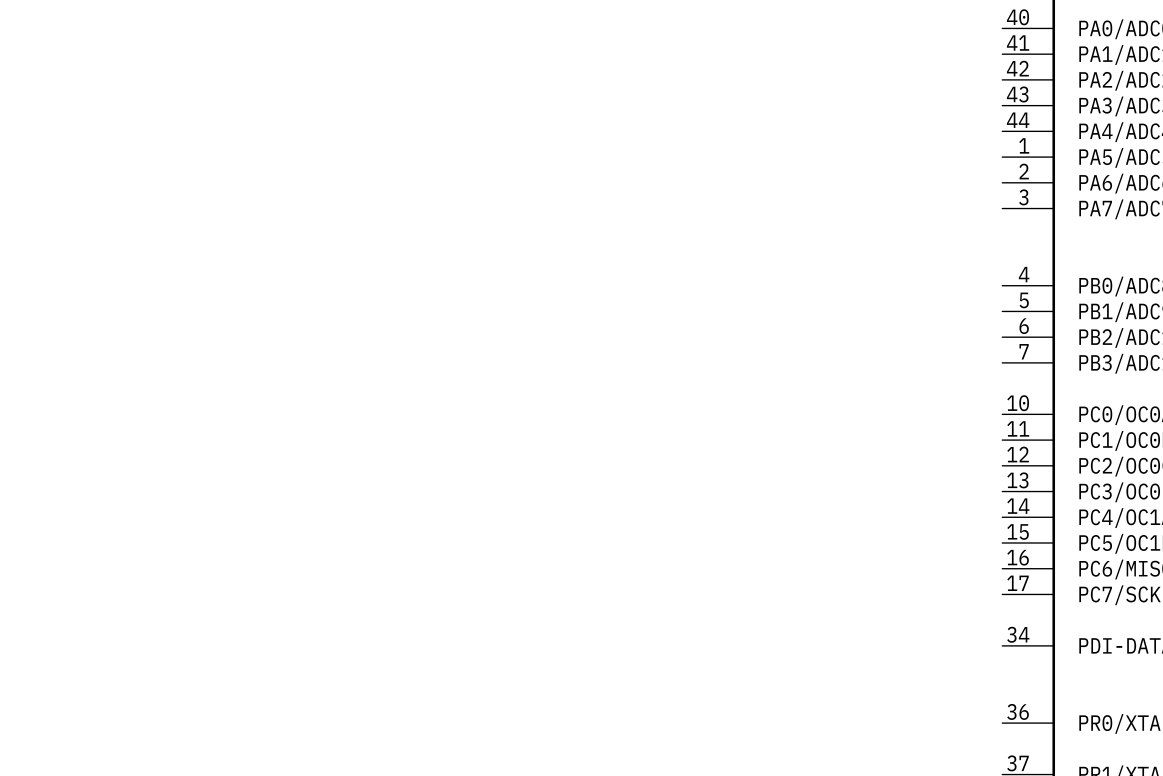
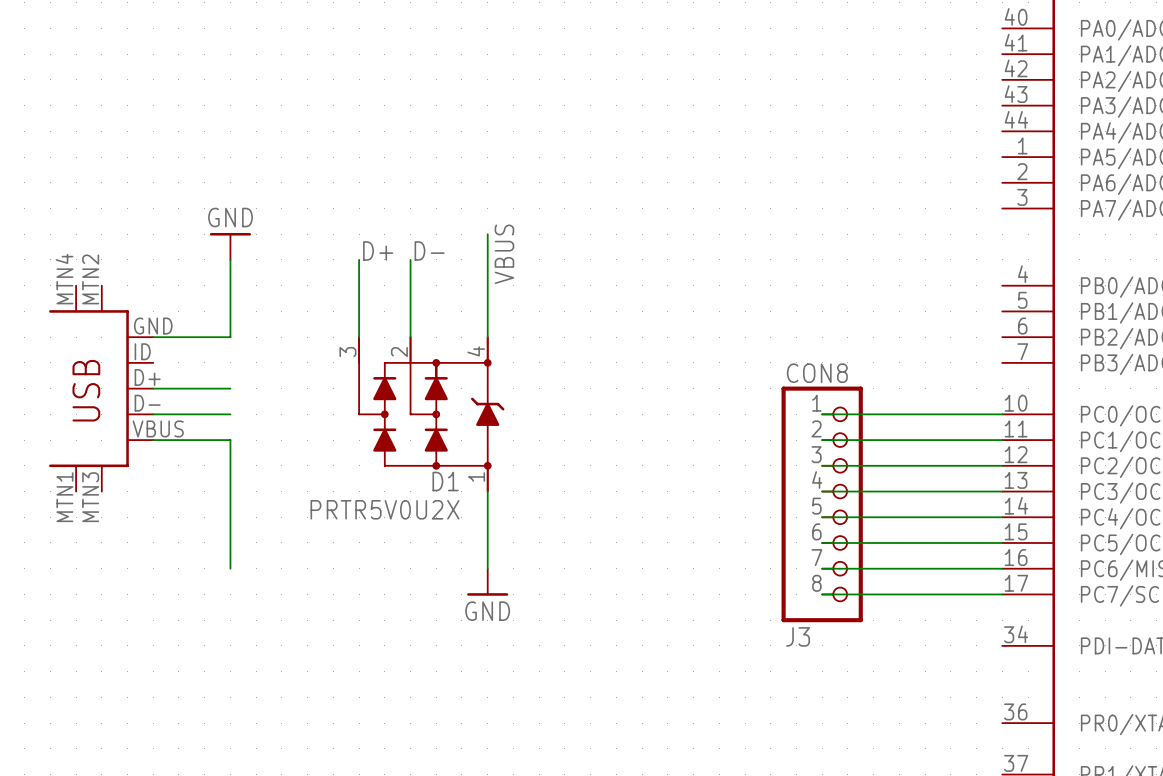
wire: none -> (487, 234) (487, 337)
power symbol: none -> GND (230, 246)
label: none -> D+ (378, 250)
label: none -> D- (429, 250)
label: none -> VBUS (504, 254)
wire: none -> (230, 259) (230, 337) (153, 337)
wire: none -> (359, 259) (359, 337)
wire: none -> (410, 259) (410, 337)
part: none -> (101, 388)
wire: none -> (153, 388) (230, 388)
wire: none -> (153, 414) (230, 414)
D1: none -> PRTR5V0U2X (431, 414)
wire: none -> (822, 414) (1002, 414)
wire: none -> (153, 440) (230, 440) (230, 568)
wire: none -> (822, 440) (1002, 440)
wire: none -> (822, 465) (1002, 465)
wire: none -> (487, 491) (487, 568)
wire: none -> (822, 491) (1002, 491)
CON8: none -> J3 (822, 504)
wire: none -> (822, 517) (1002, 517)
wire: none -> (822, 542) (1002, 542)
wire: none -> (822, 568) (1002, 568)
power symbol: none -> GND (487, 582)
wire: none -> (822, 594) (1002, 594)

